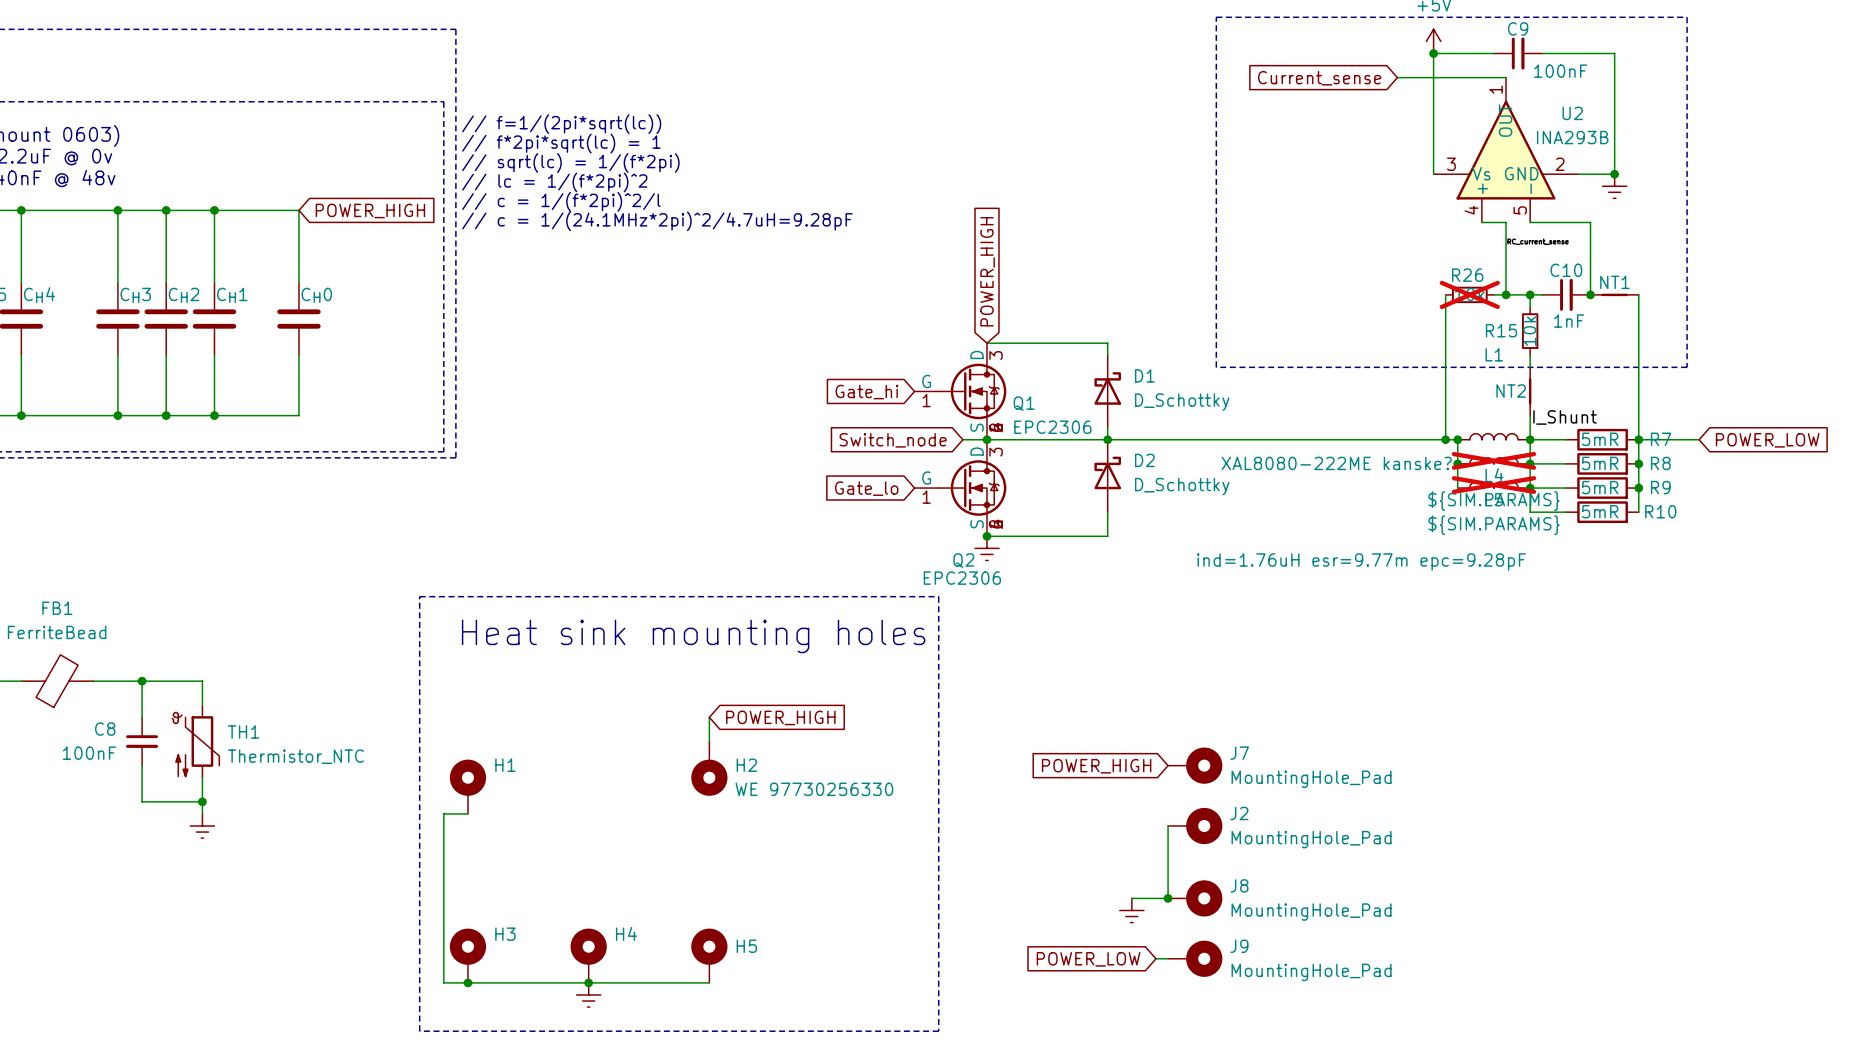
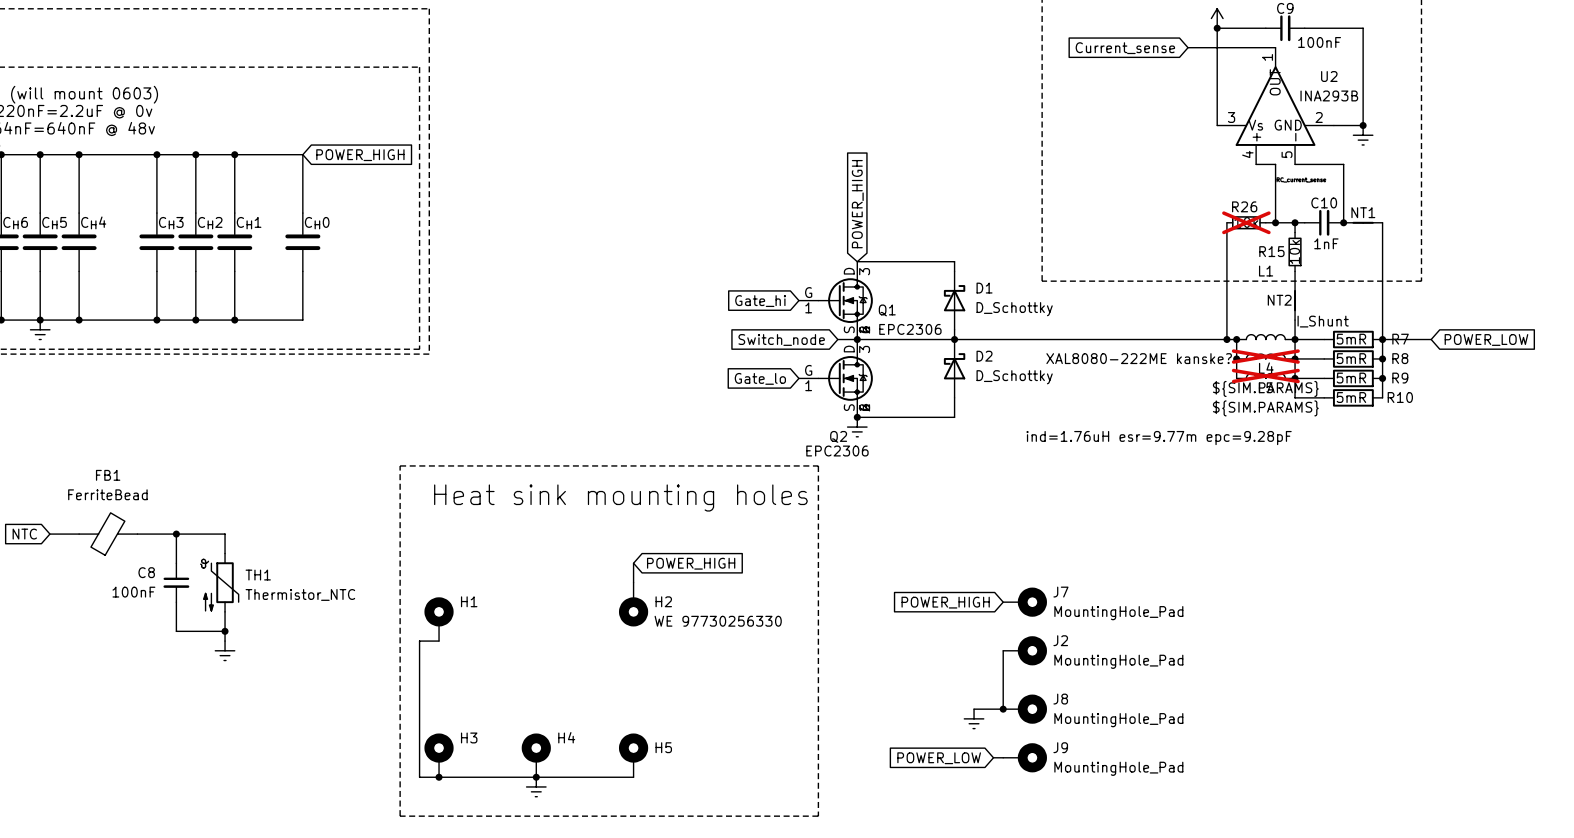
text: // f=1/(2pi*sqrt(lc)) (561, 124) -> none
text: // f*2pi*sqrt(lc) = 1 (561, 143) -> none
text: // sqrt(lc) = 1/(f*2pi) (570, 162) -> none
text: // lc = 1/(f*2pi)^2 (554, 182) -> none
text: // c = 1/(f*2pi)^2/l (561, 201) -> none
text: // c = 1/(24.1MHz*2pi)^2/4.7uH=9.28pF (657, 221) -> none

